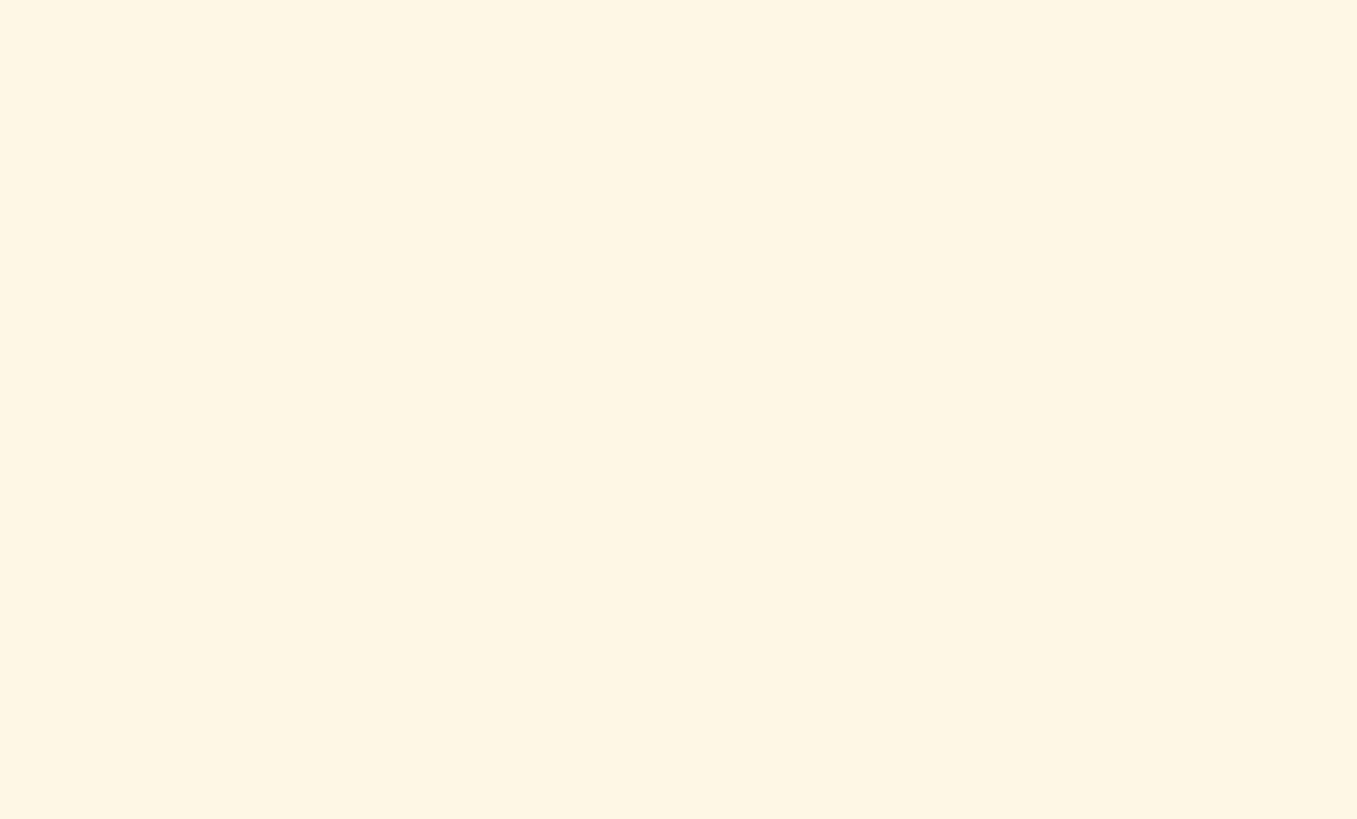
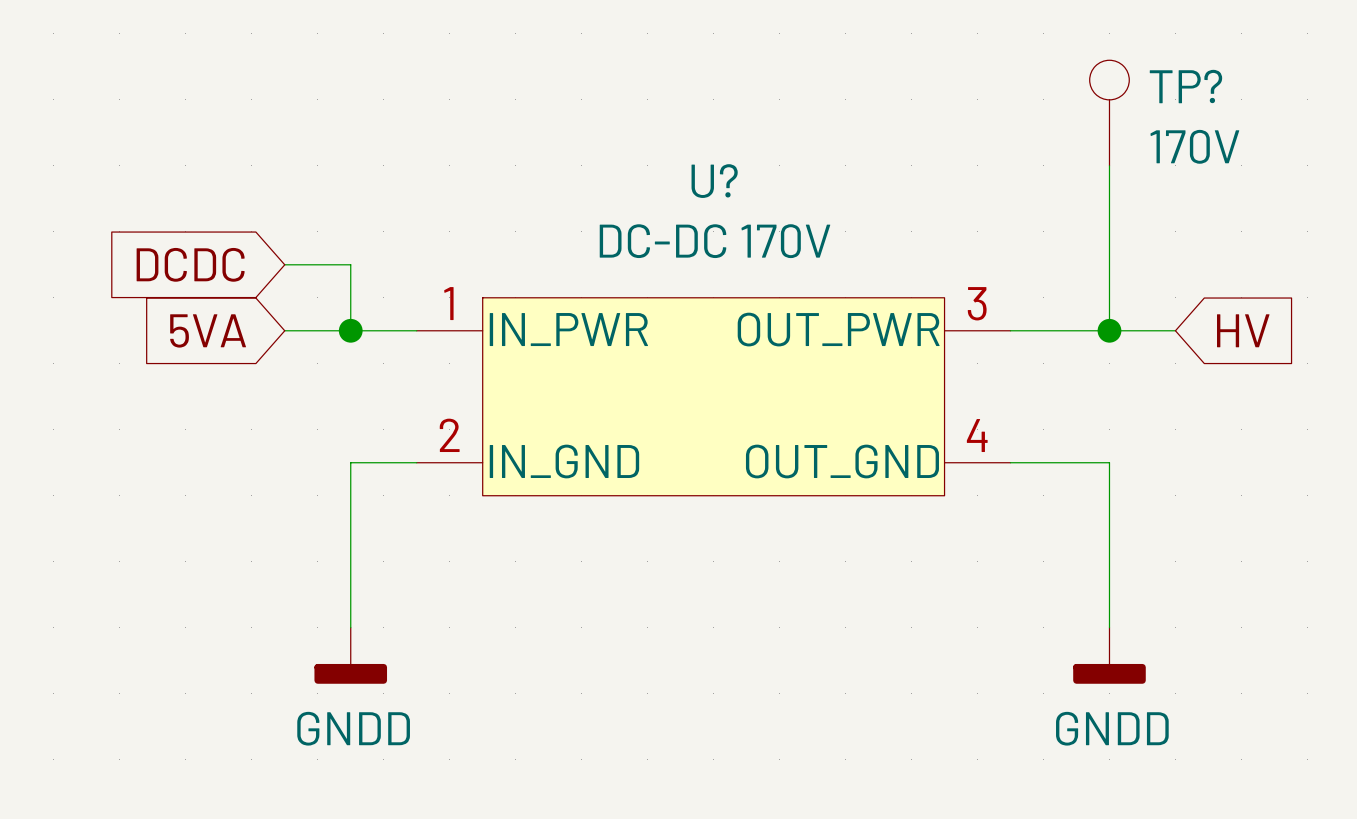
TP?: none -> 170V (1109, 113)
wire: none -> (1109, 165) (1109, 330)
global label: none -> DCDC (190, 264)
wire: none -> (284, 264) (350, 264) (350, 330)
wire: none -> (284, 330) (416, 330)
junction: none -> (350, 330)
wire: none -> (1010, 330) (1175, 330)
junction: none -> (1109, 330)
global label: none -> HV (1243, 330)
global label: none -> 5VA (208, 330)
U?: none -> DC-DC 170V (713, 396)
wire: none -> (416, 462) (350, 462) (350, 627)
wire: none -> (1010, 462) (1109, 462) (1109, 627)
power symbol: none -> GNDD (350, 655)
power symbol: none -> GNDD (1109, 655)

